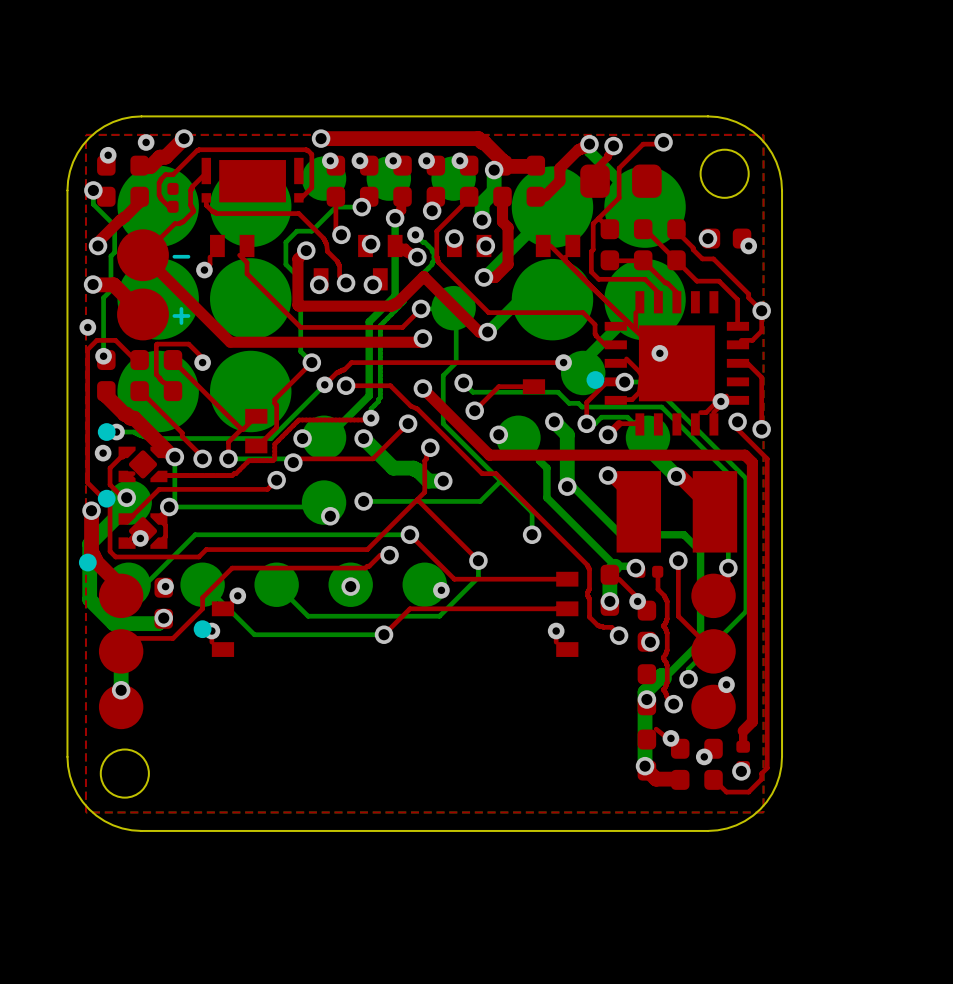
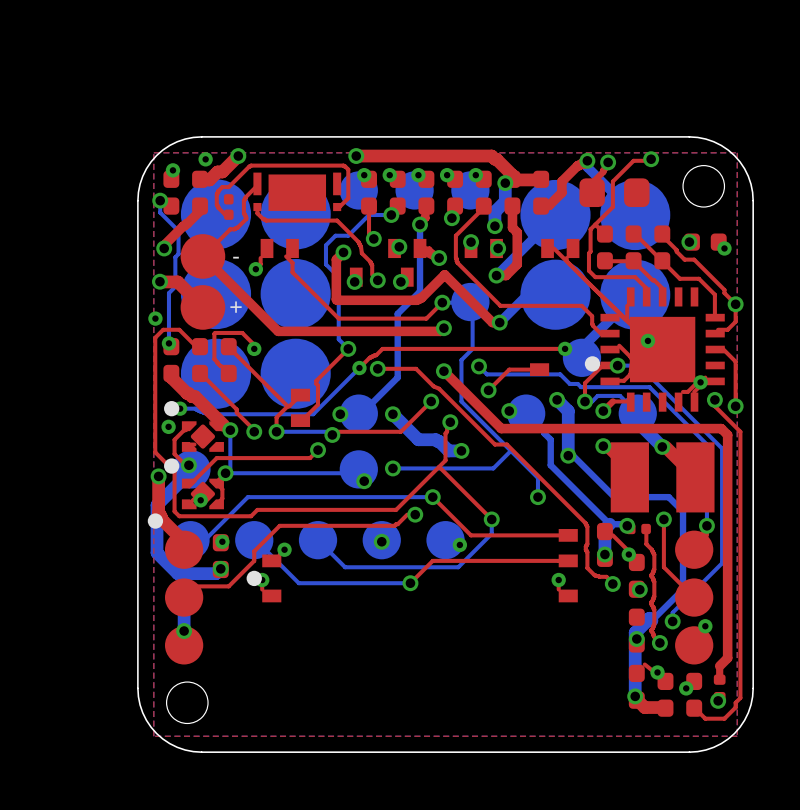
bottom track: (415, 234) (432, 249) (434, 260) (406, 290) (404, 301) (380, 325) (380, 397) (371, 408) (371, 418) -> none
via: (415, 234) -> none
top track: (371, 418) (365, 419) (298, 419) (274, 444) (274, 458) (272, 460) (248, 460) (232, 475) (161, 475) -> none
via: (371, 418) -> none

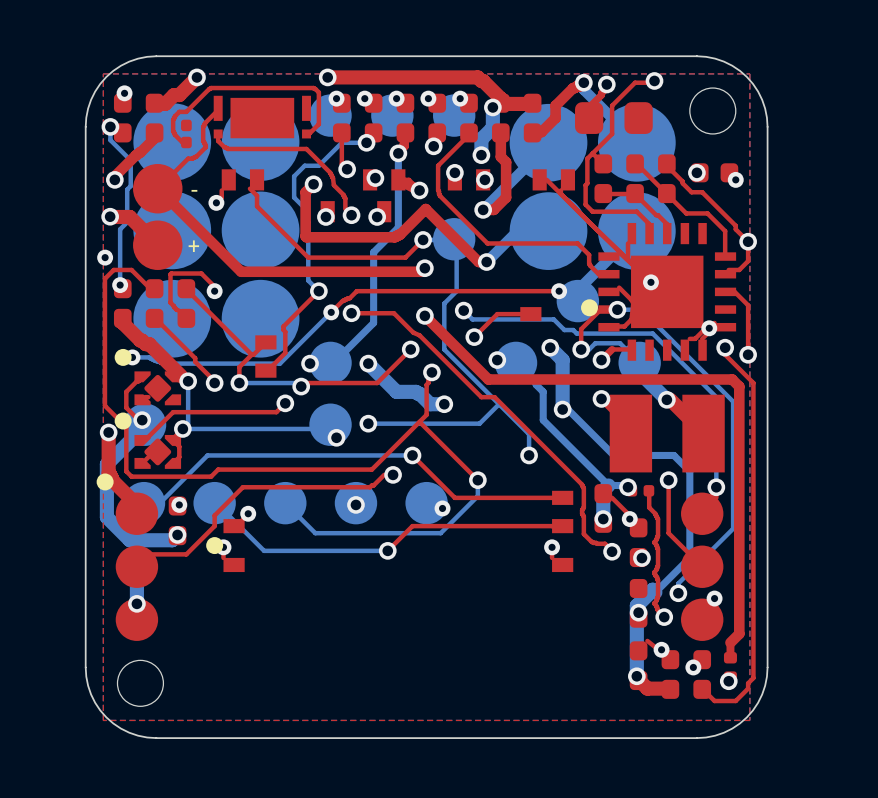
via: (205, 159) -> none
via: (168, 426) -> none
via: (200, 500) -> none

